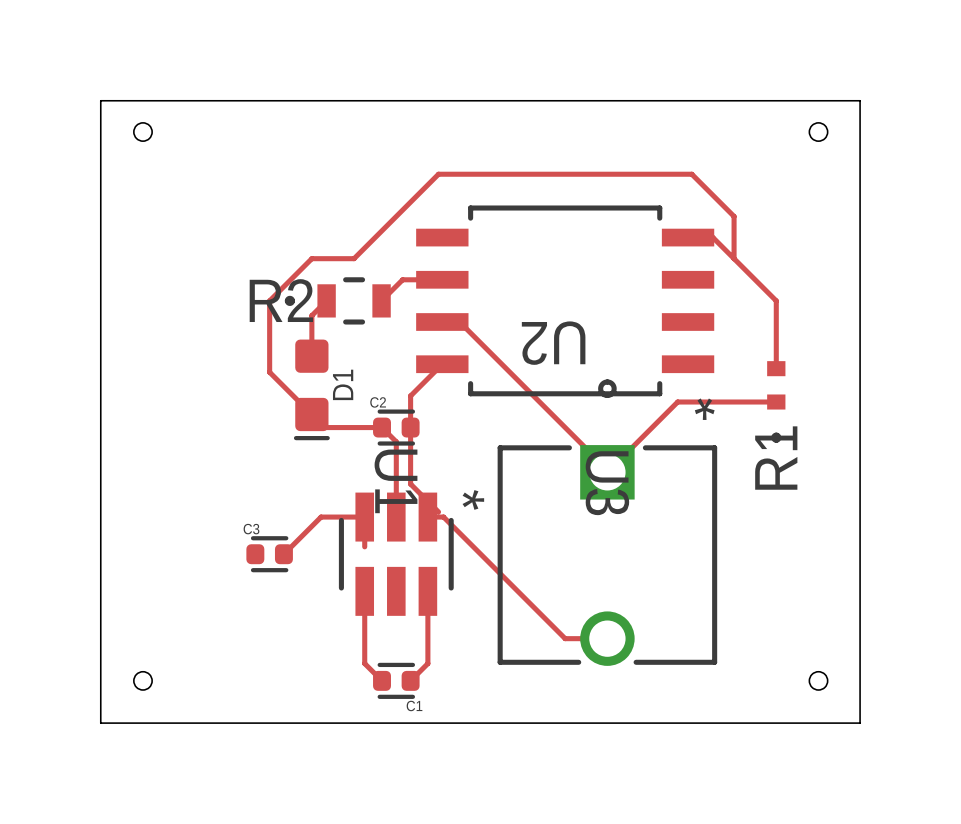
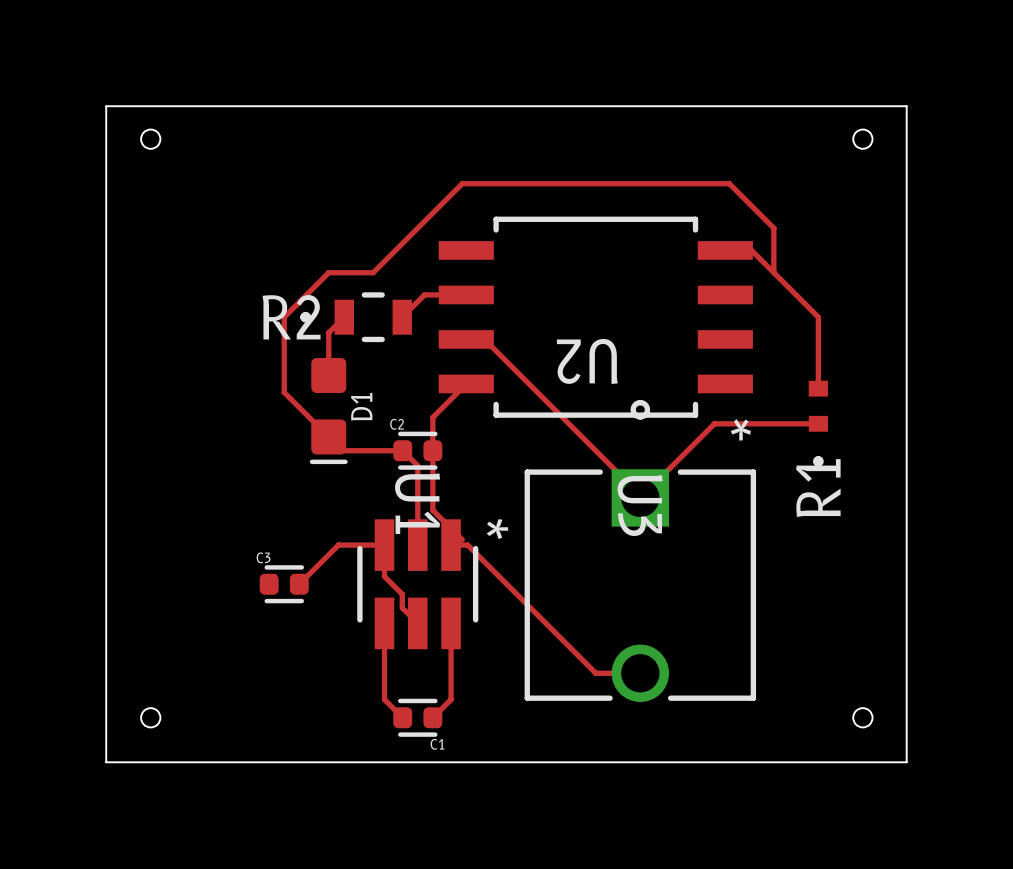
track: none -> (384, 576) (402, 594) (402, 607) (417, 623)

